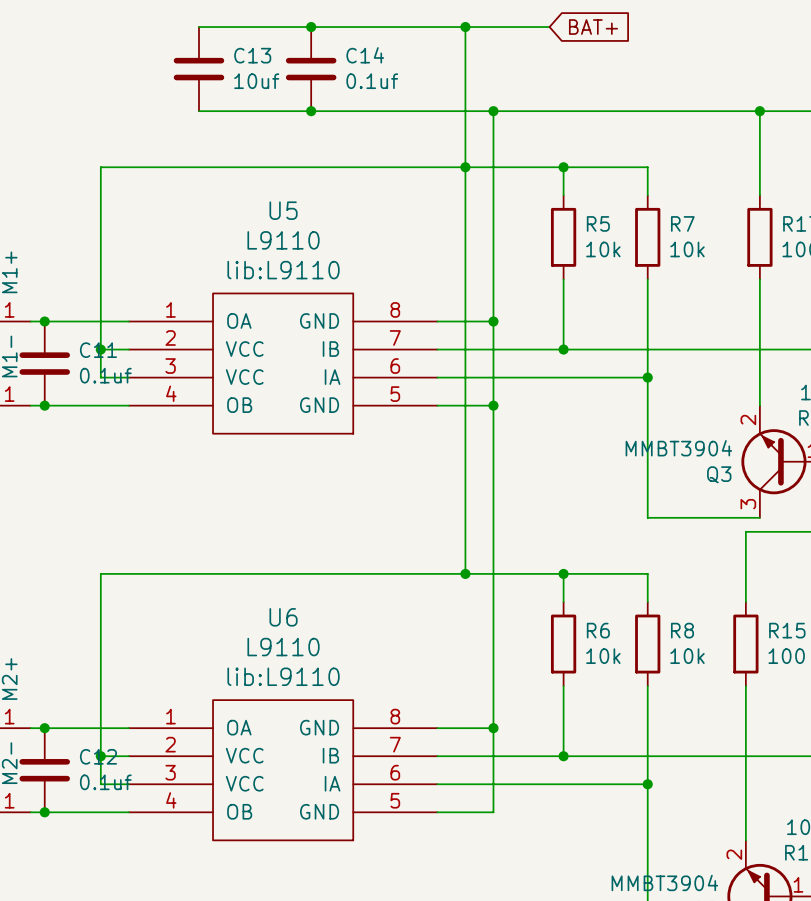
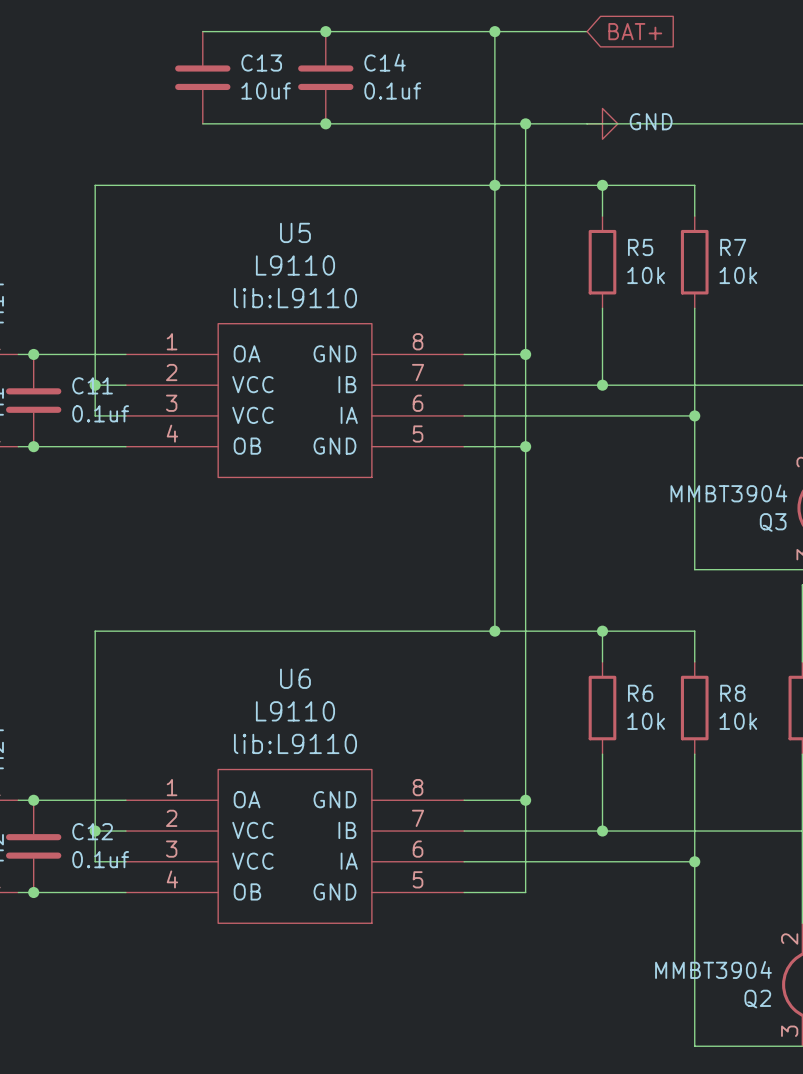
power symbol: none -> GND (602, 123)

